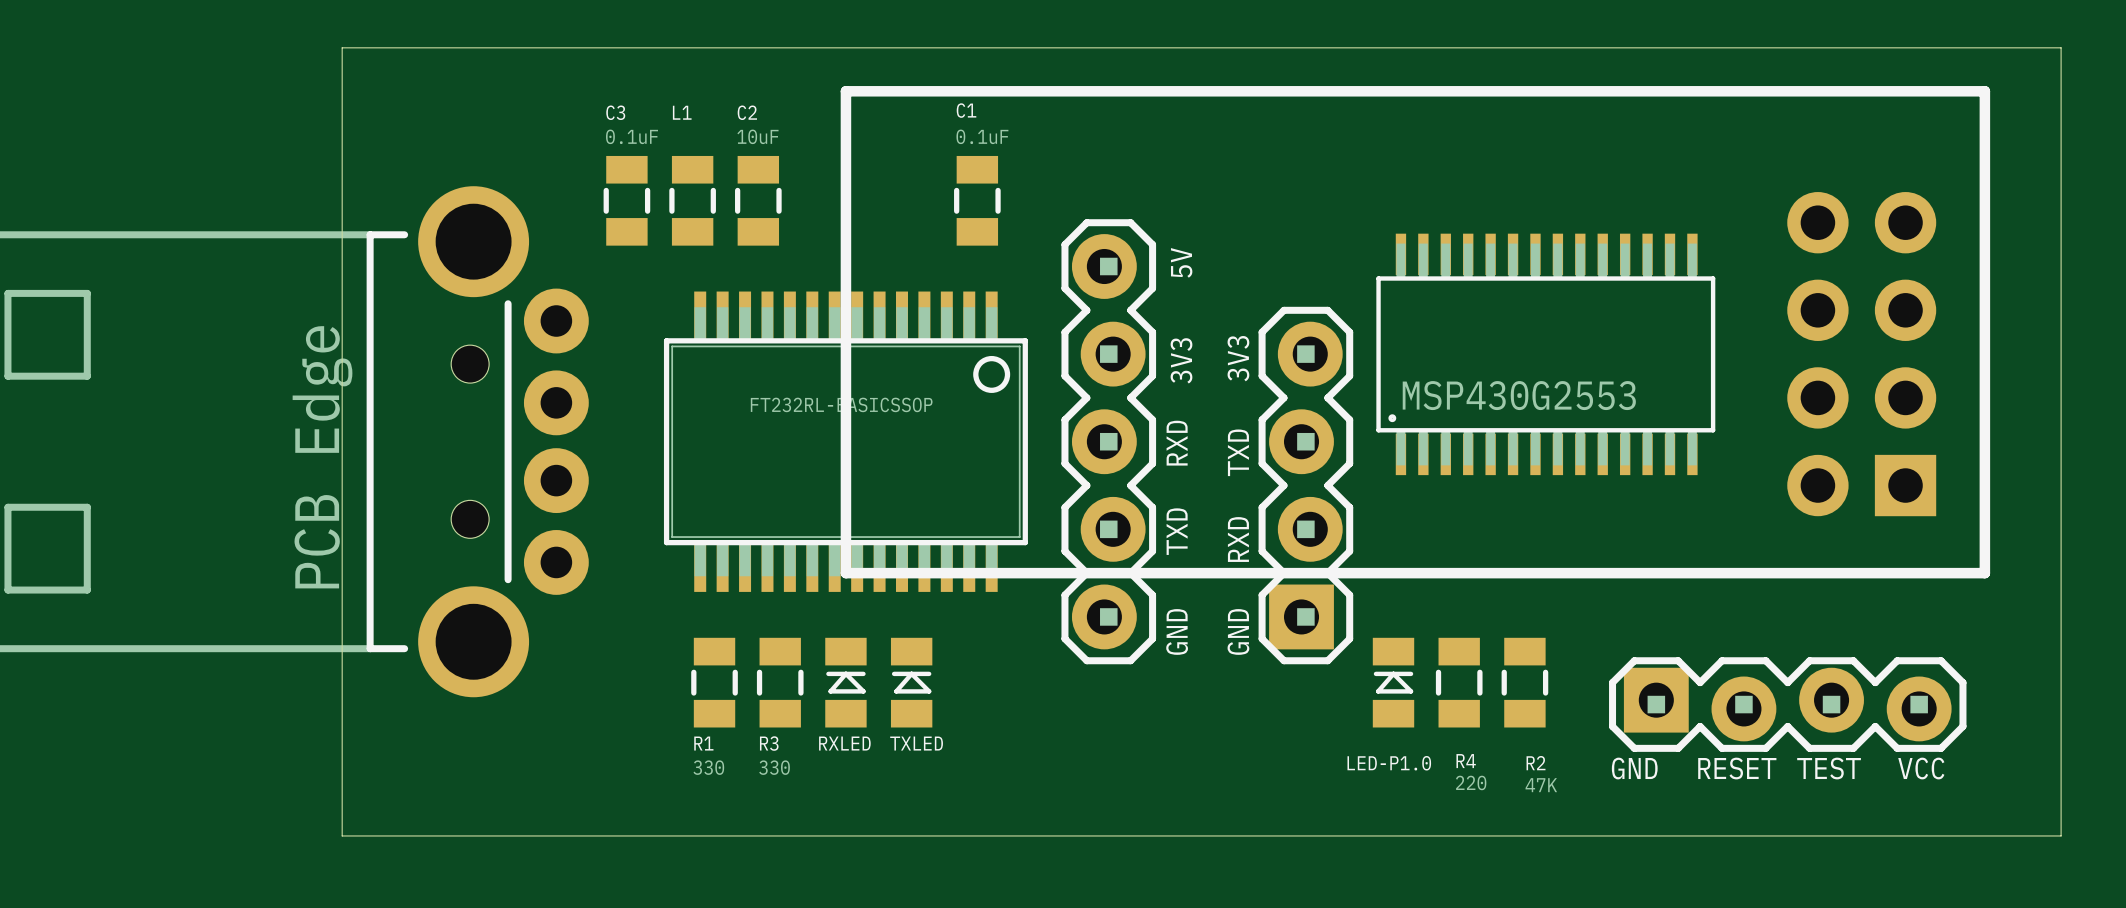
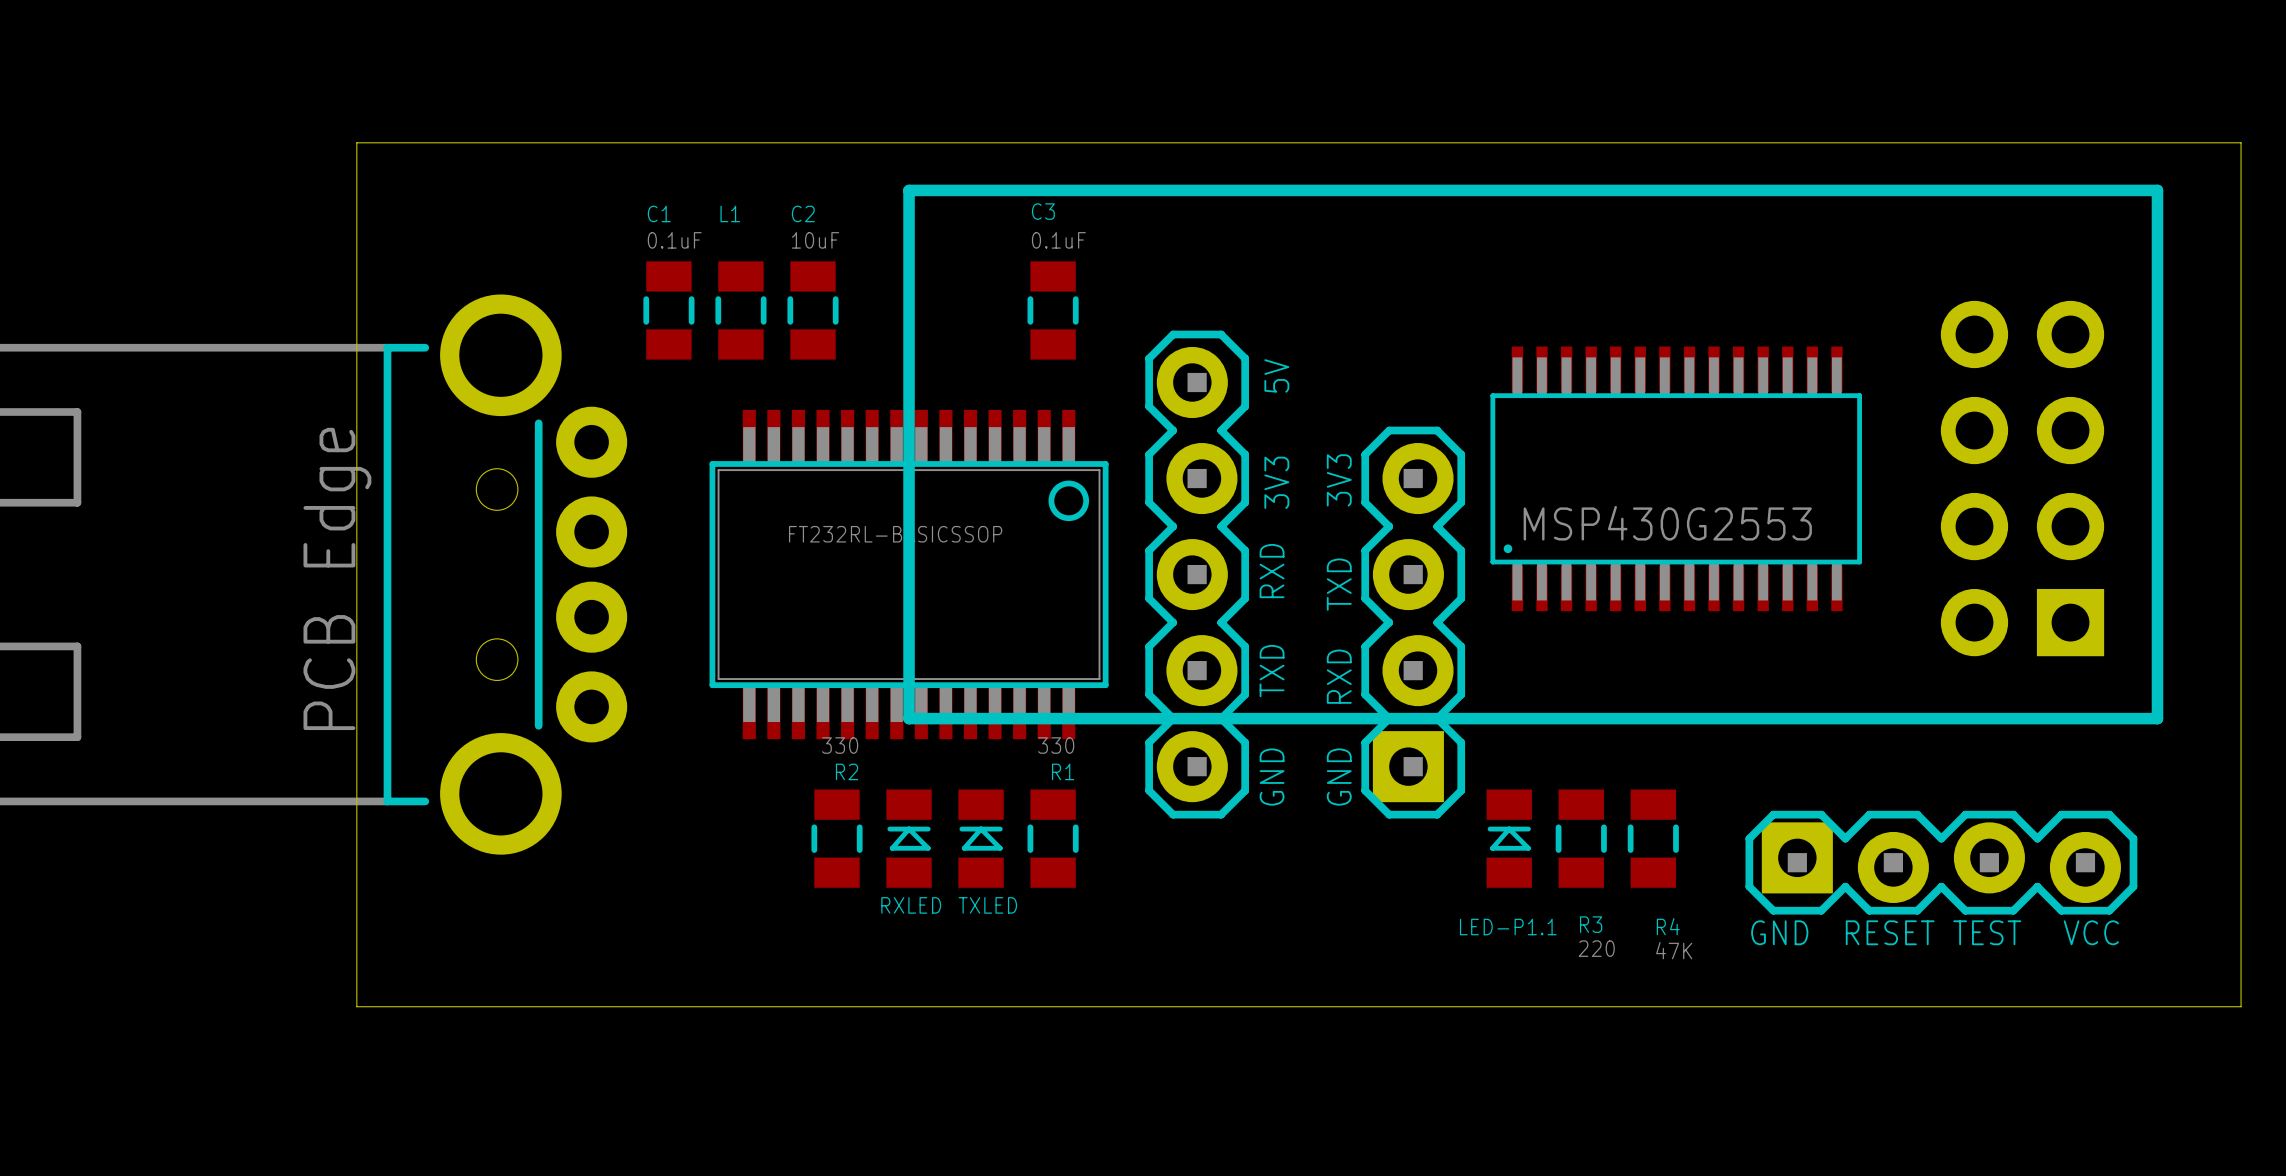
C1 name: C1 (966, 110) -> C3 (1043, 211)
C3 name: C3 (615, 112) -> C1 (659, 213)
R1 position: (714, 682) -> (1053, 838)
R1 name position: R1 (703, 743) -> R1 (1063, 771)
R3 name: R3 (769, 743) -> R2 (847, 771)
R4 name: R4 (1466, 761) -> R3 (1591, 924)
LED-P1.0 name: LED-P1.0 (1389, 763) -> LED-P1.1 (1508, 927)
R2 name: R2 (1536, 763) -> R4 (1668, 926)
R1 value position: 330 (708, 767) -> 330 (1056, 745)
R3 value position: 330 (774, 767) -> 330 (840, 745)

